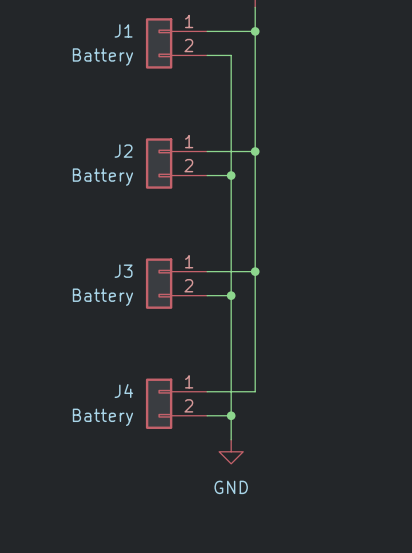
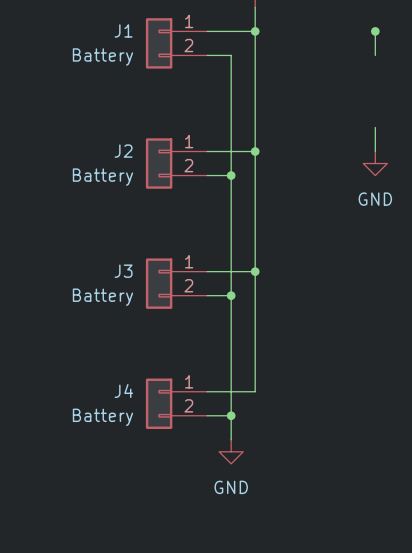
wire: none -> (375, 31) (375, 55)
junction: none -> (375, 31)
wire: none -> (375, 127) (375, 151)
power symbol: none -> GND (375, 163)

